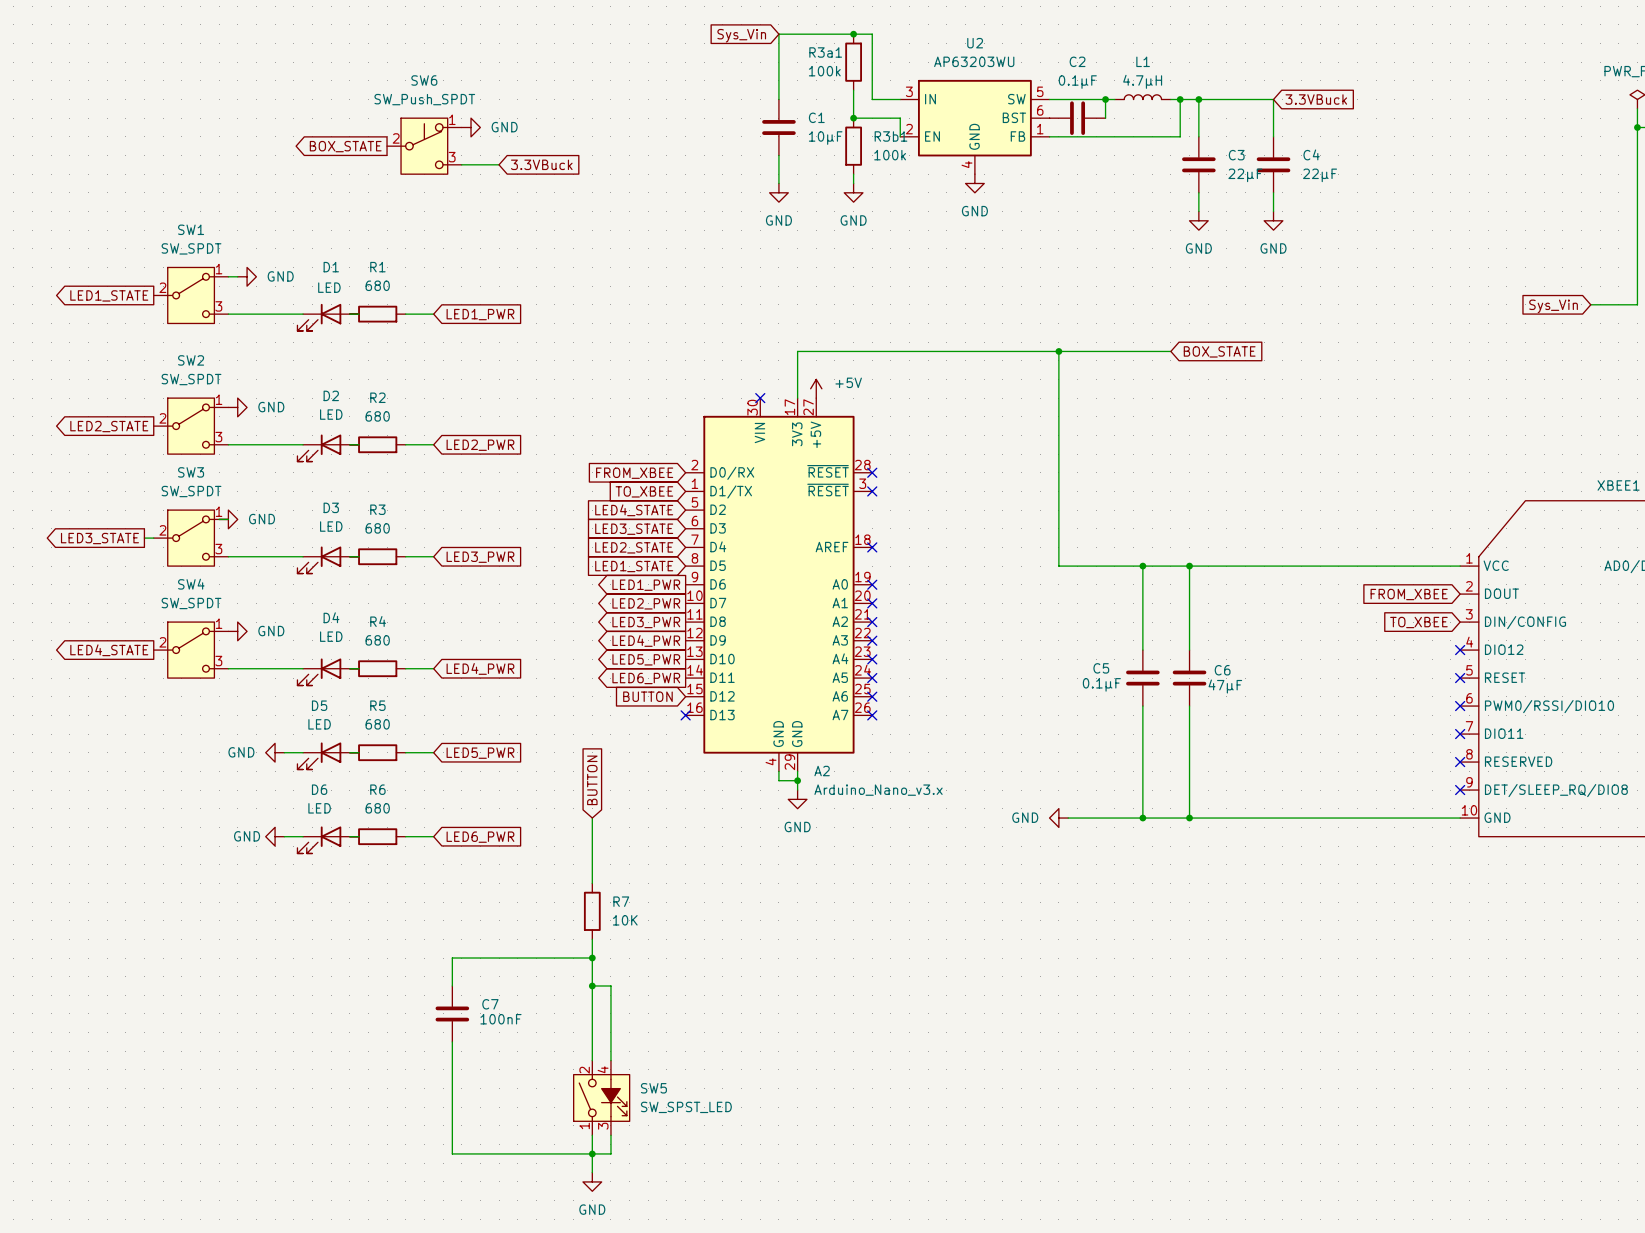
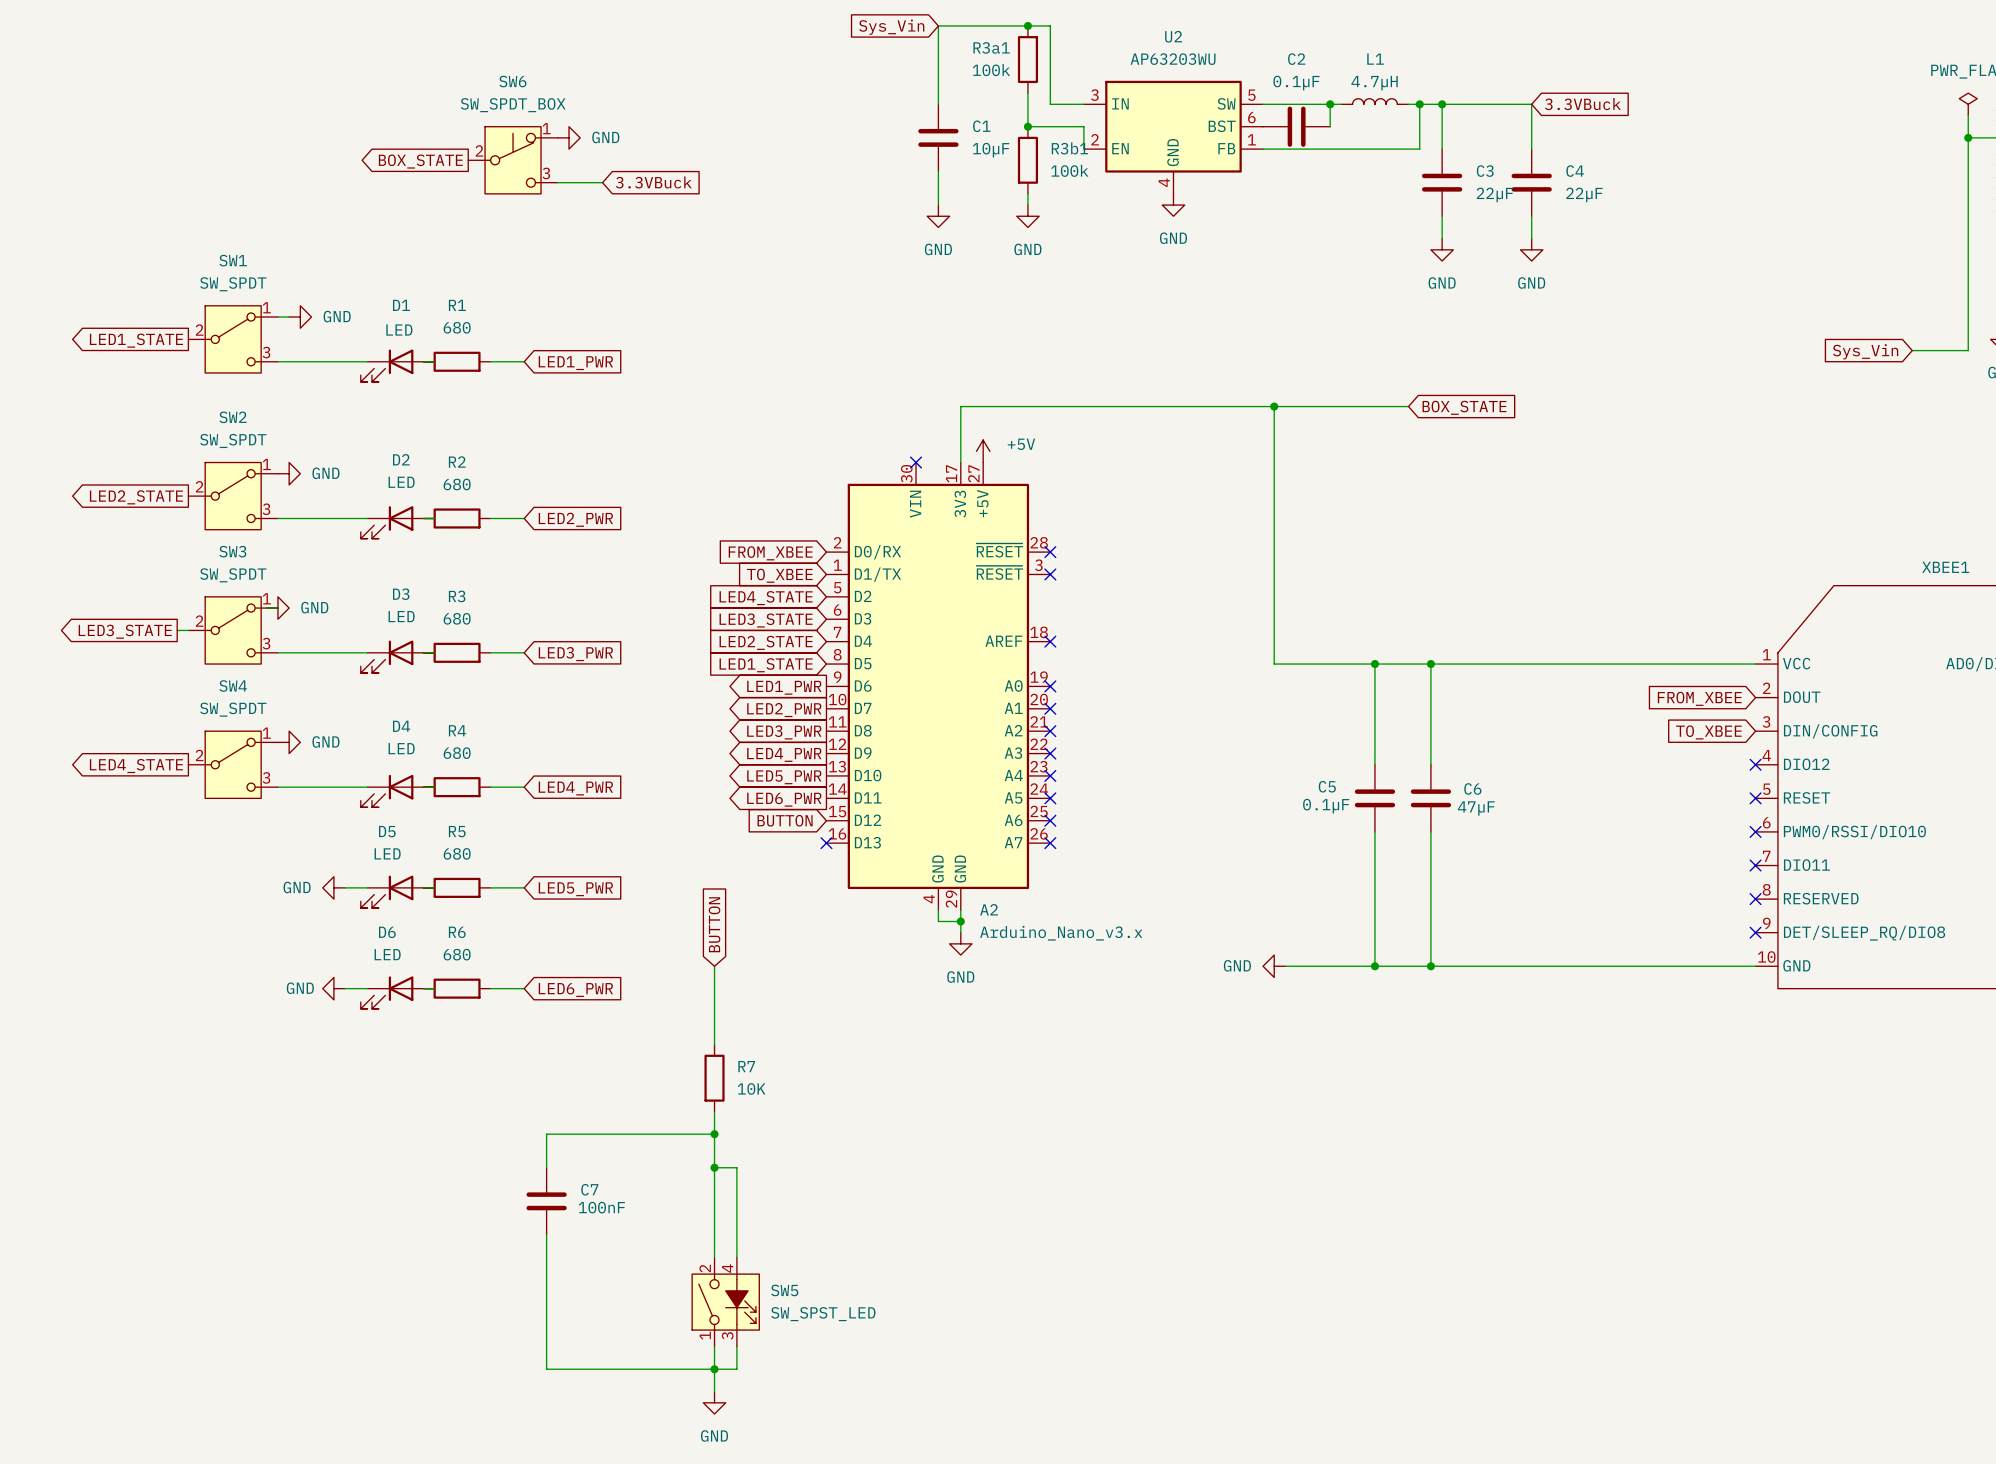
SW6 value: SW_Push_SPDT (424, 99) -> SW_SPDT_BOX (513, 105)

